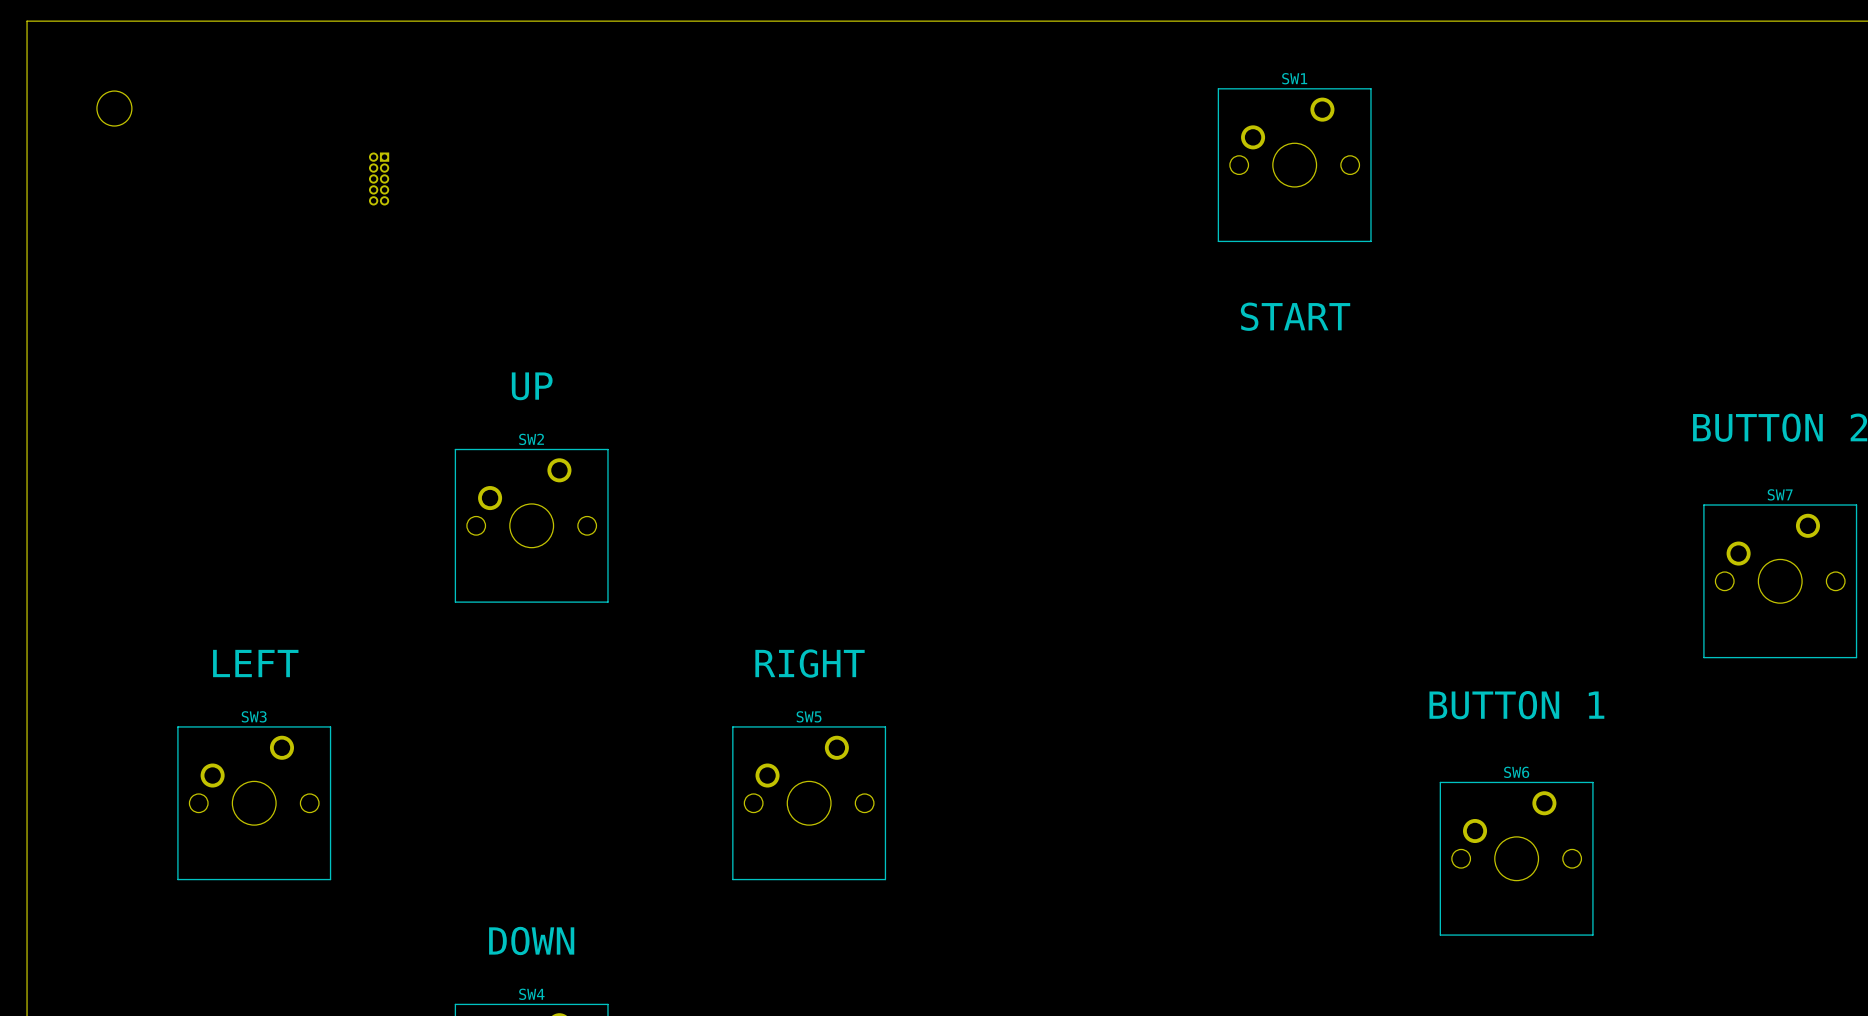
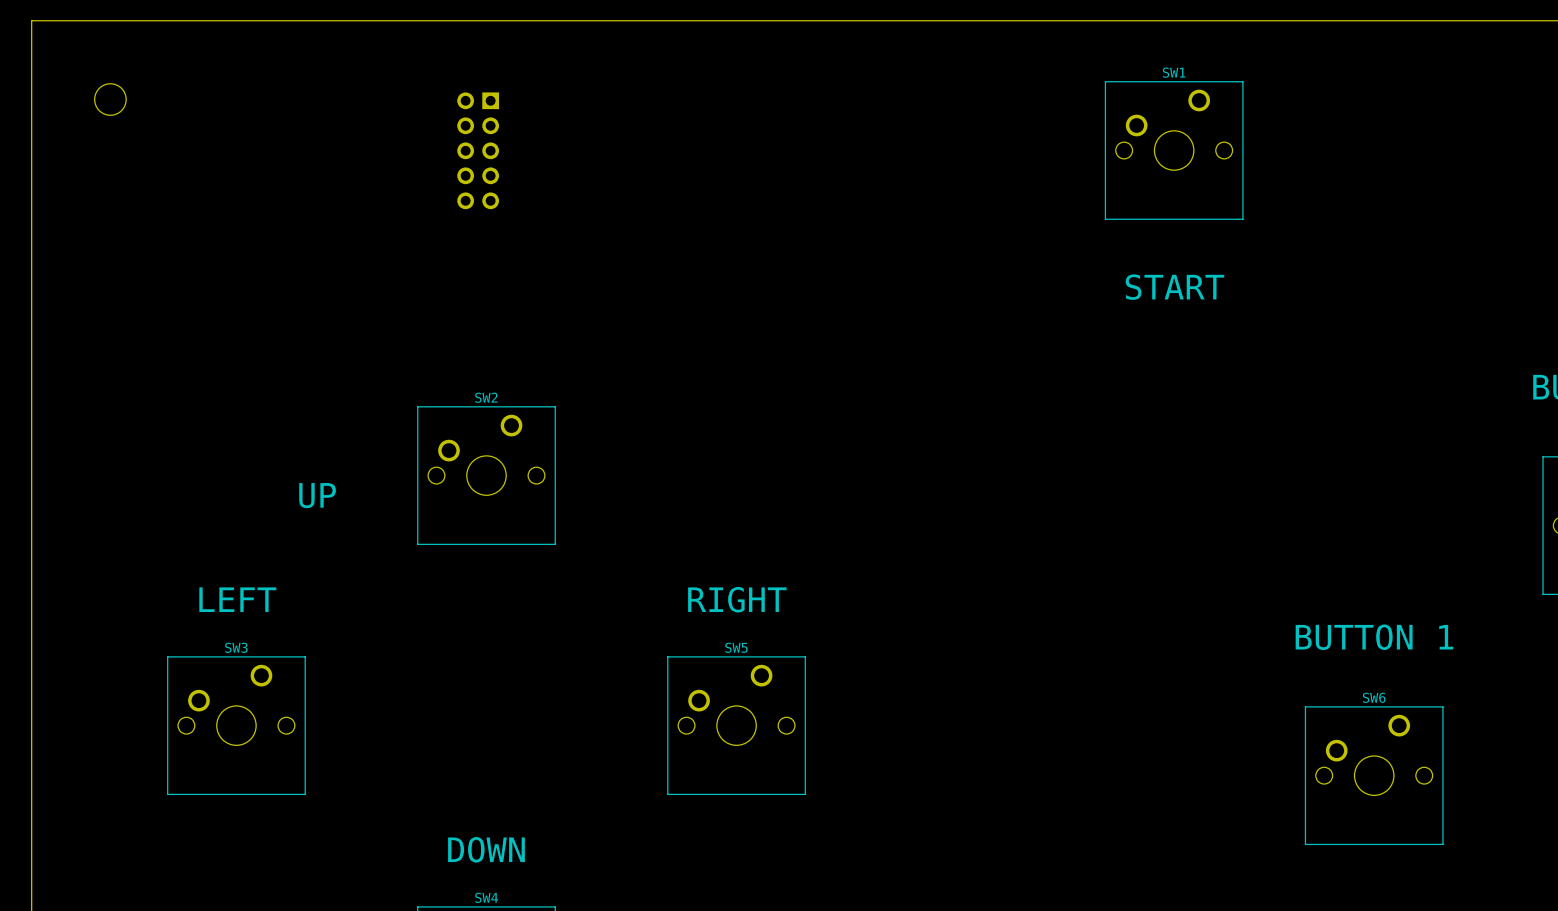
part: none -> (478, 150)
part: (379, 178) -> none
text position: UP (532, 386) -> UP (317, 495)

